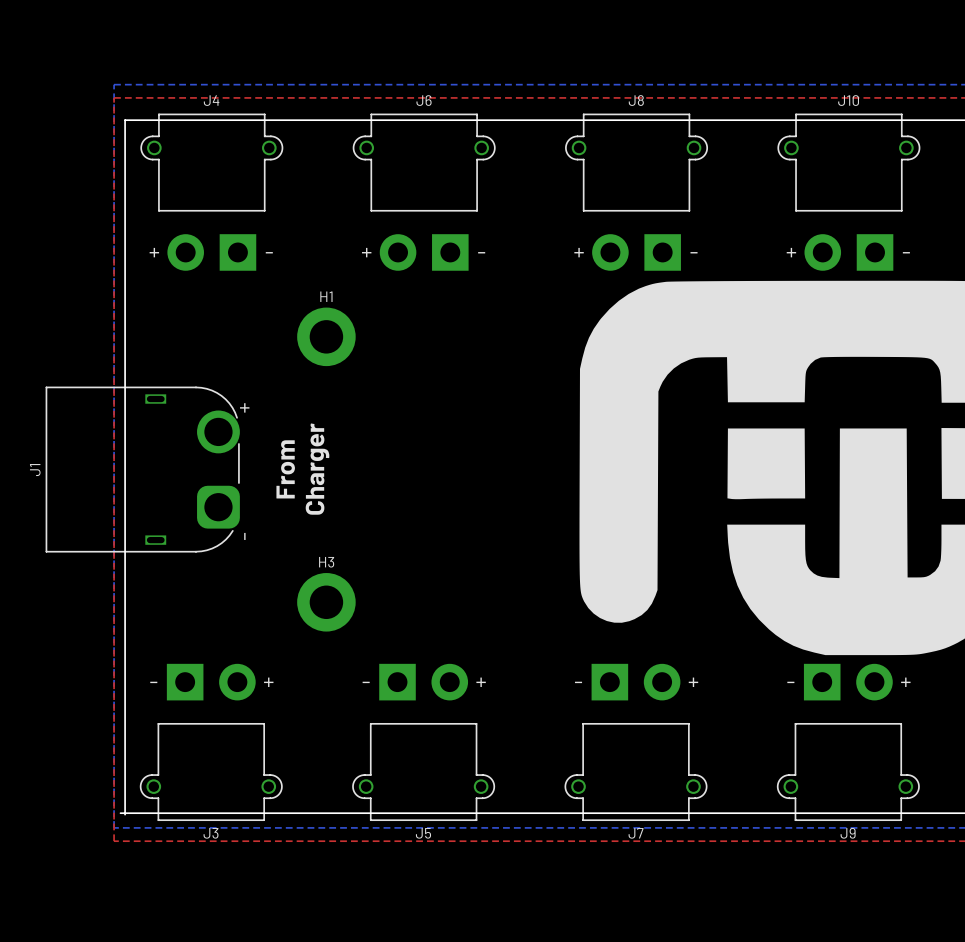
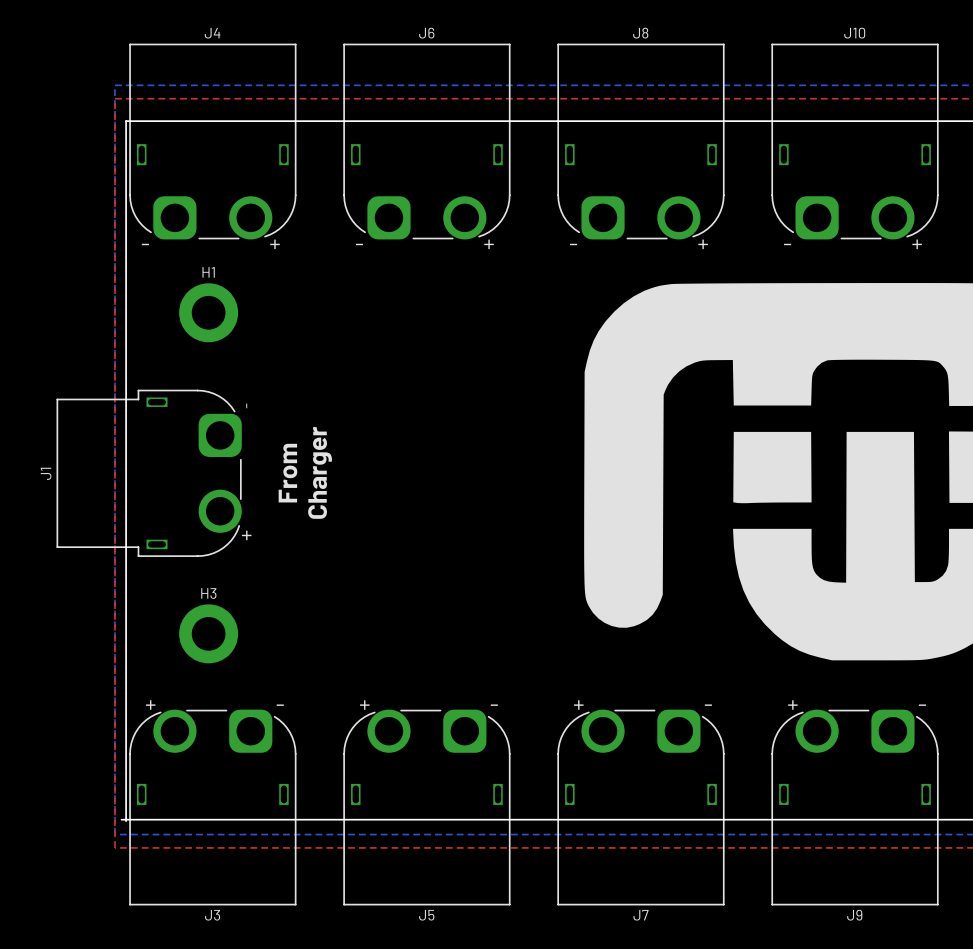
J4 footprint: [140, 113, 284, 271] -> [129, 43, 297, 240]
J6 footprint: [352, 113, 496, 271] -> [343, 43, 511, 240]
J8 footprint: [565, 113, 708, 271] -> [557, 43, 725, 240]
J10 footprint: [777, 113, 921, 271] -> [771, 43, 939, 240]
H1 position: (326, 336) -> (208, 312)
J1 footprint: [45, 386, 240, 553] -> [56, 389, 242, 557]
H3 position: (326, 602) -> (208, 633)
J3 footprint: [140, 663, 283, 821] -> [129, 709, 297, 906]
J5 footprint: [352, 663, 495, 821] -> [343, 709, 511, 906]
J7 footprint: [564, 663, 708, 821] -> [557, 709, 725, 906]
J9 footprint: [777, 663, 920, 821] -> [771, 709, 939, 906]

